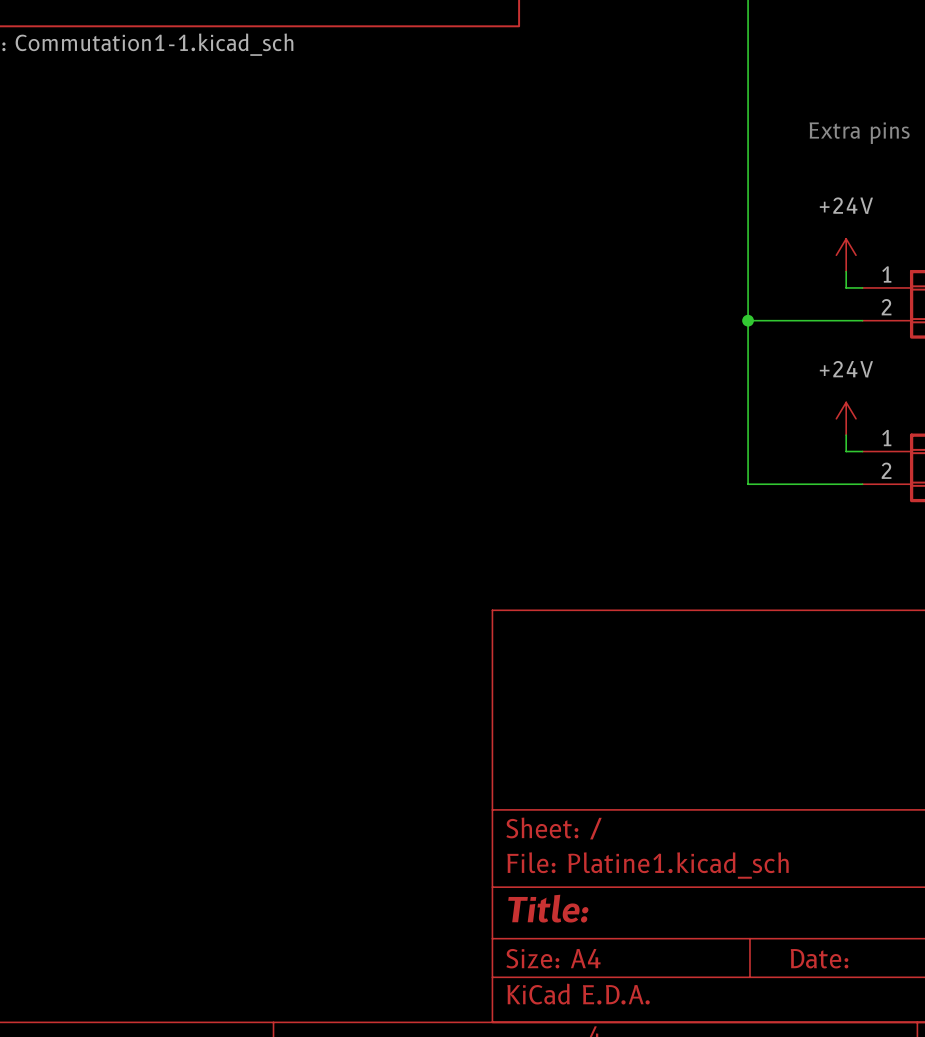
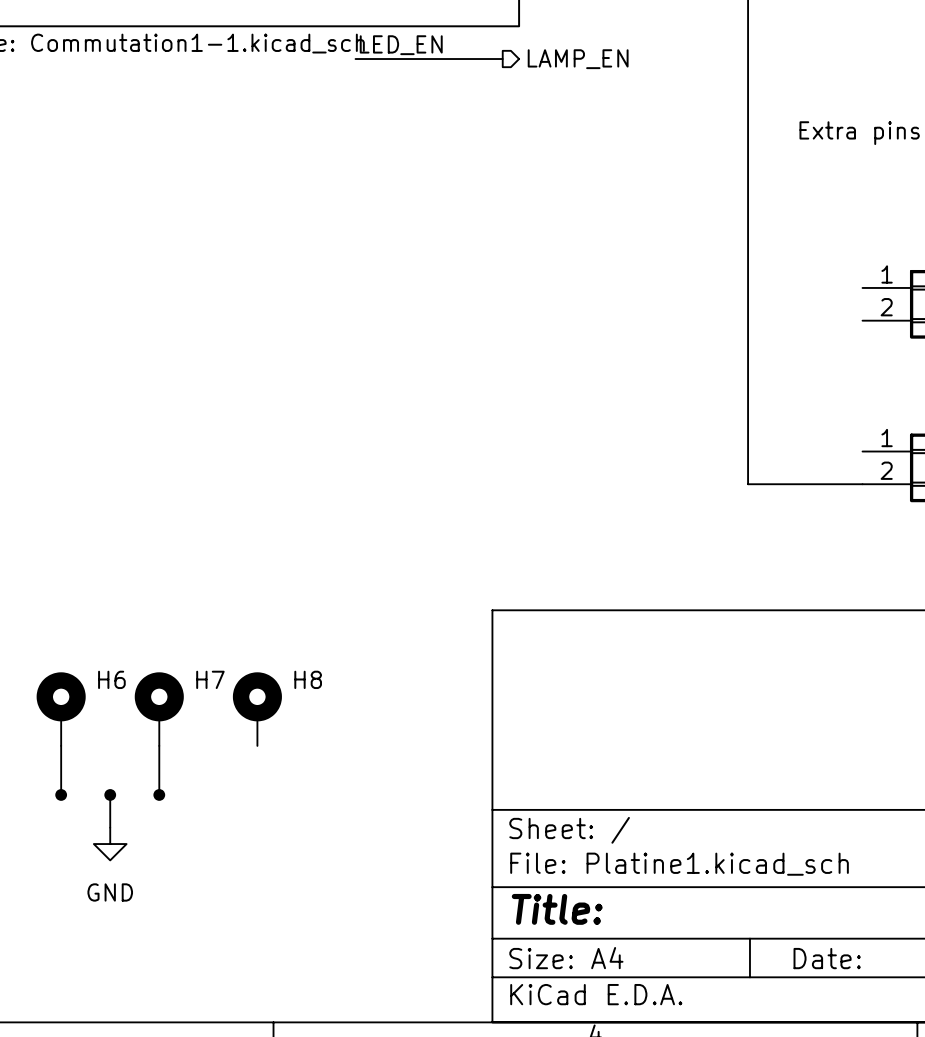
label: none -> LED_EN (401, 45)
wire: none -> (355, 59) (502, 59)
sheet pin: none -> LAMP_EN (578, 59)
power symbol: +24V (846, 255) -> none
wire: (846, 271) (846, 287) (862, 287) -> none
wire: (748, 320) (862, 320) -> none
junction: (748, 320) -> none
power symbol: +24V (846, 418) -> none
wire: (846, 435) (846, 451) (862, 451) -> none
H6: none -> (61, 709)
H7: none -> (159, 709)
H8: none -> (257, 709)
wire: none -> (61, 745) (61, 794)
wire: none -> (159, 745) (159, 794)
junction: none -> (61, 794)
wire: none -> (110, 794) (110, 827)
junction: none -> (110, 794)
junction: none -> (159, 794)
power symbol: none -> GND (110, 844)

